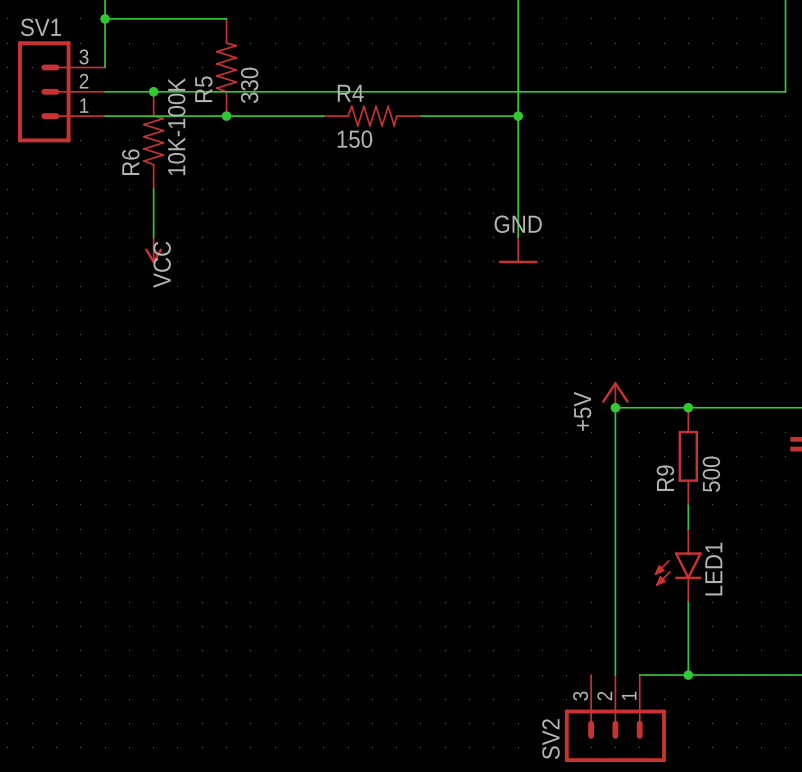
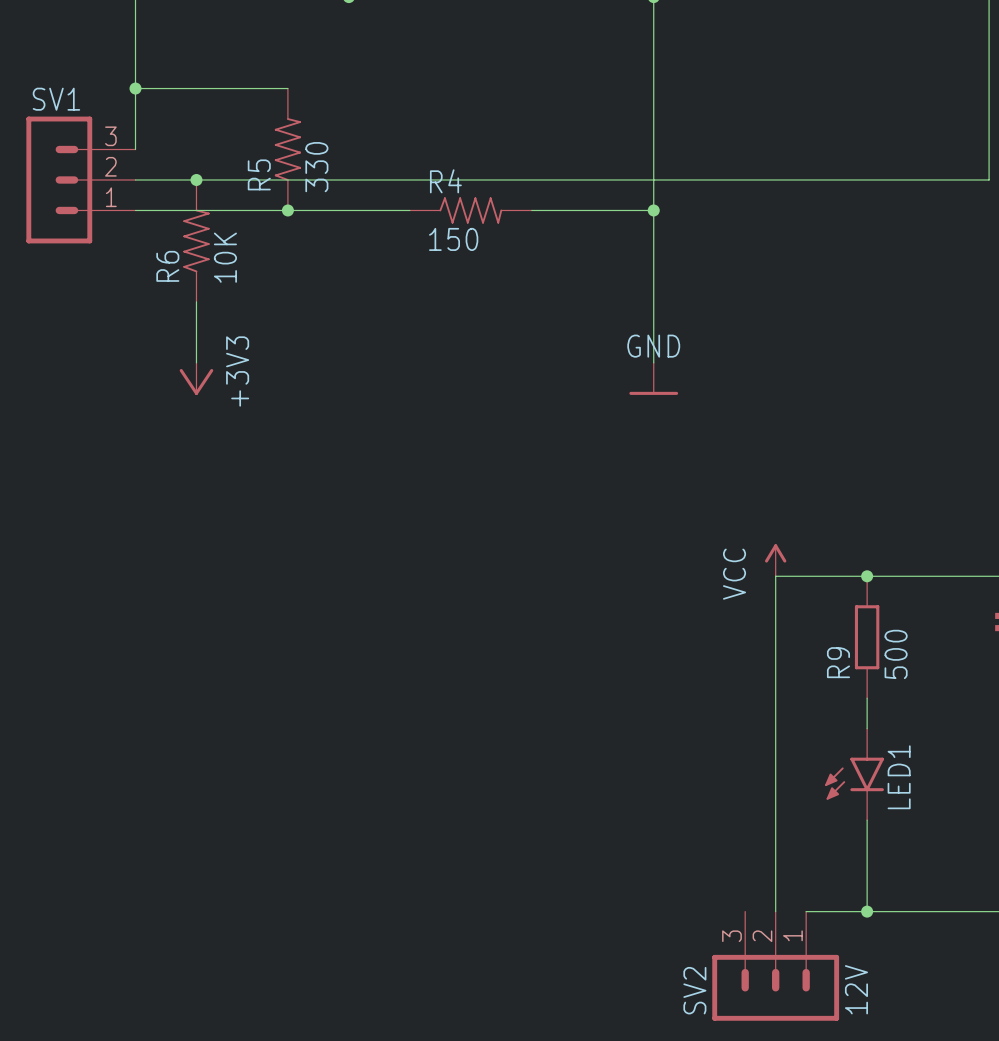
R6 value: 10K-100K (176, 126) -> 10K (225, 257)
power symbol: VCC (153, 250) -> +3V3 (196, 378)
power symbol: +5V (615, 394) -> VCC (775, 560)
junction: (615, 407) -> none
SV2 value: none -> 12V (856, 989)

